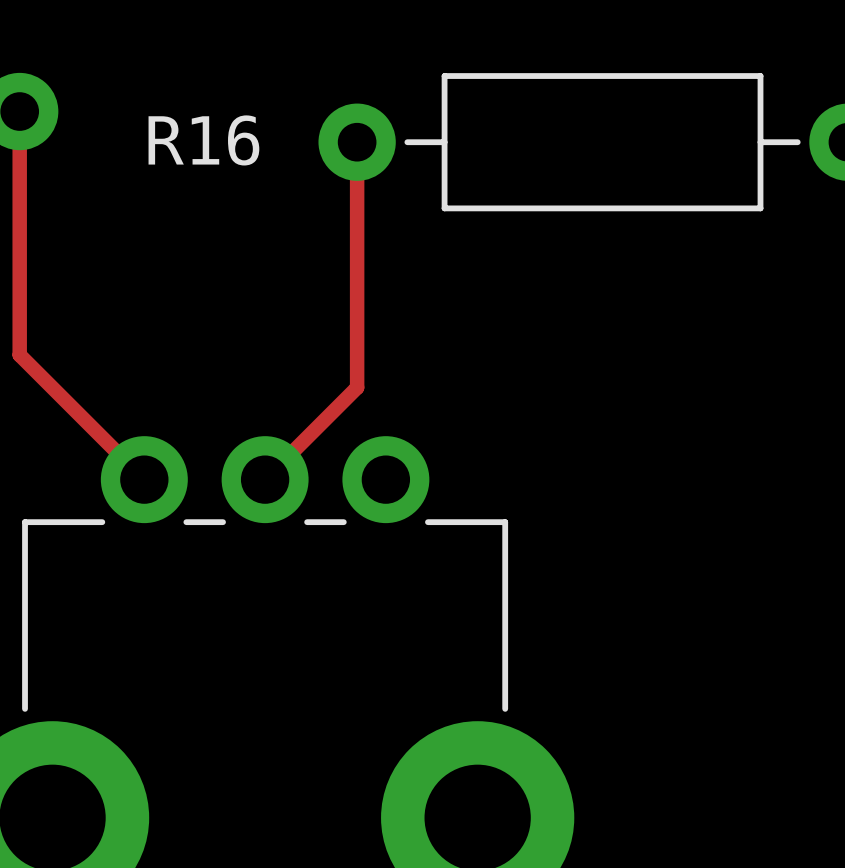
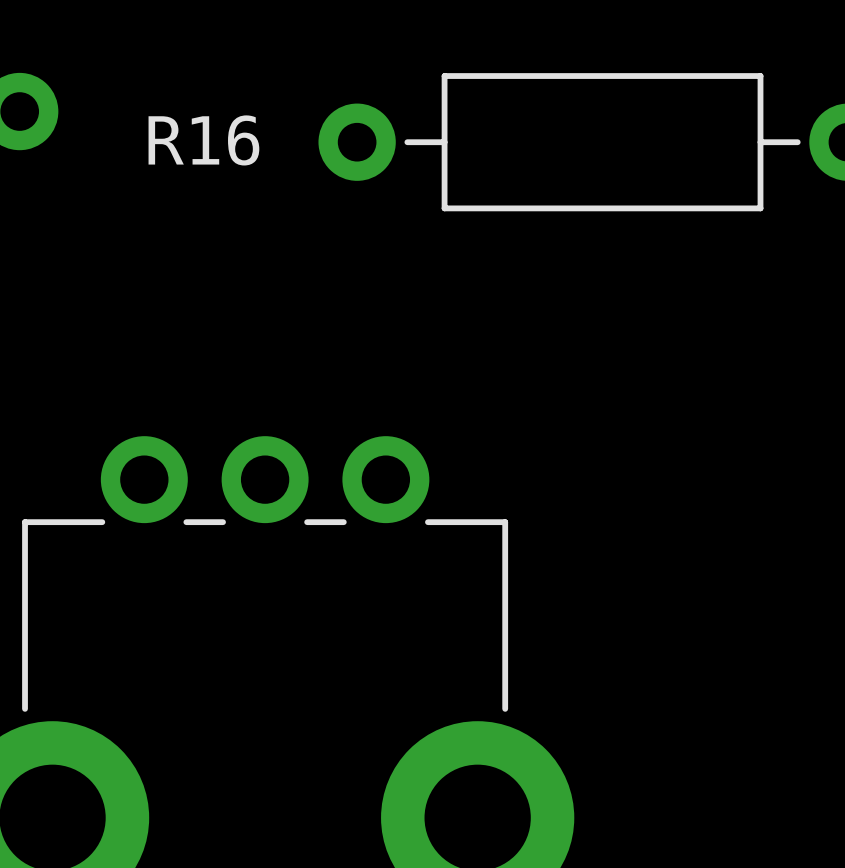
track: (19, 111) (19, 355) (144, 479) -> none
track: (357, 142) (357, 387) (265, 479) -> none

